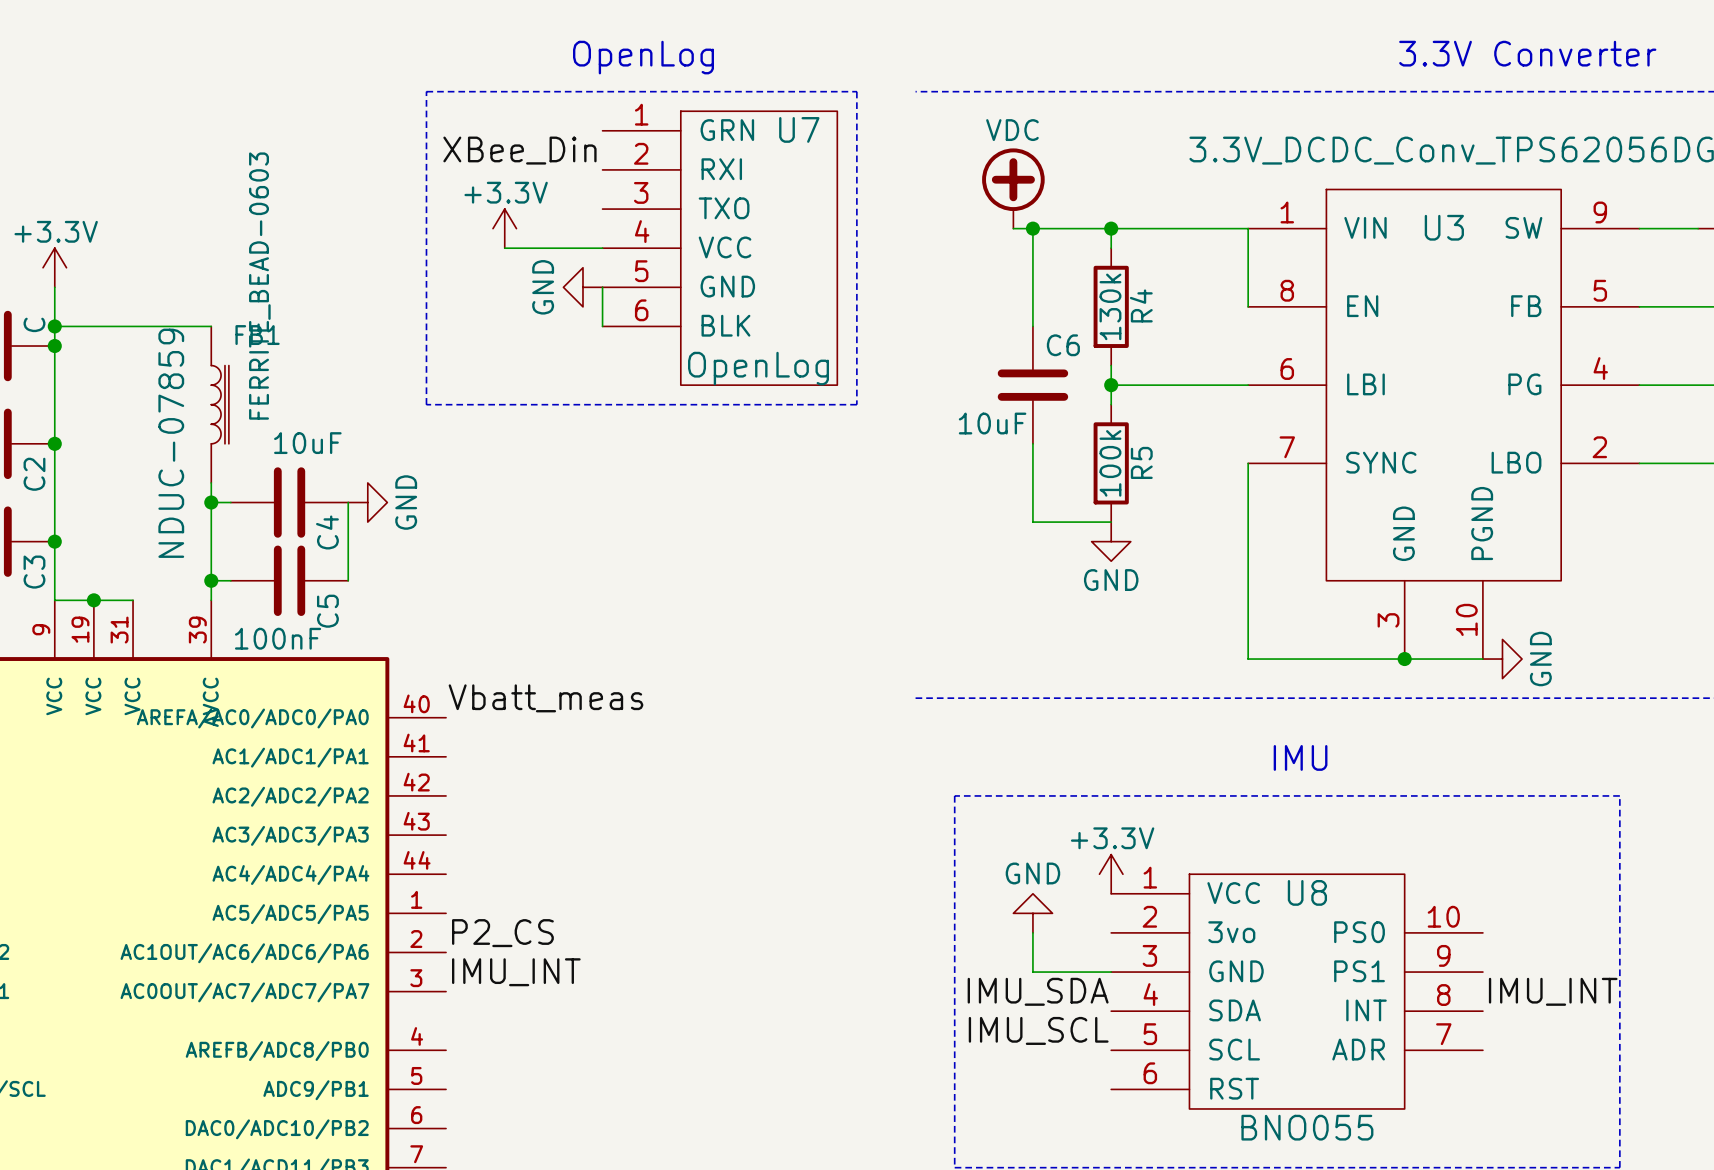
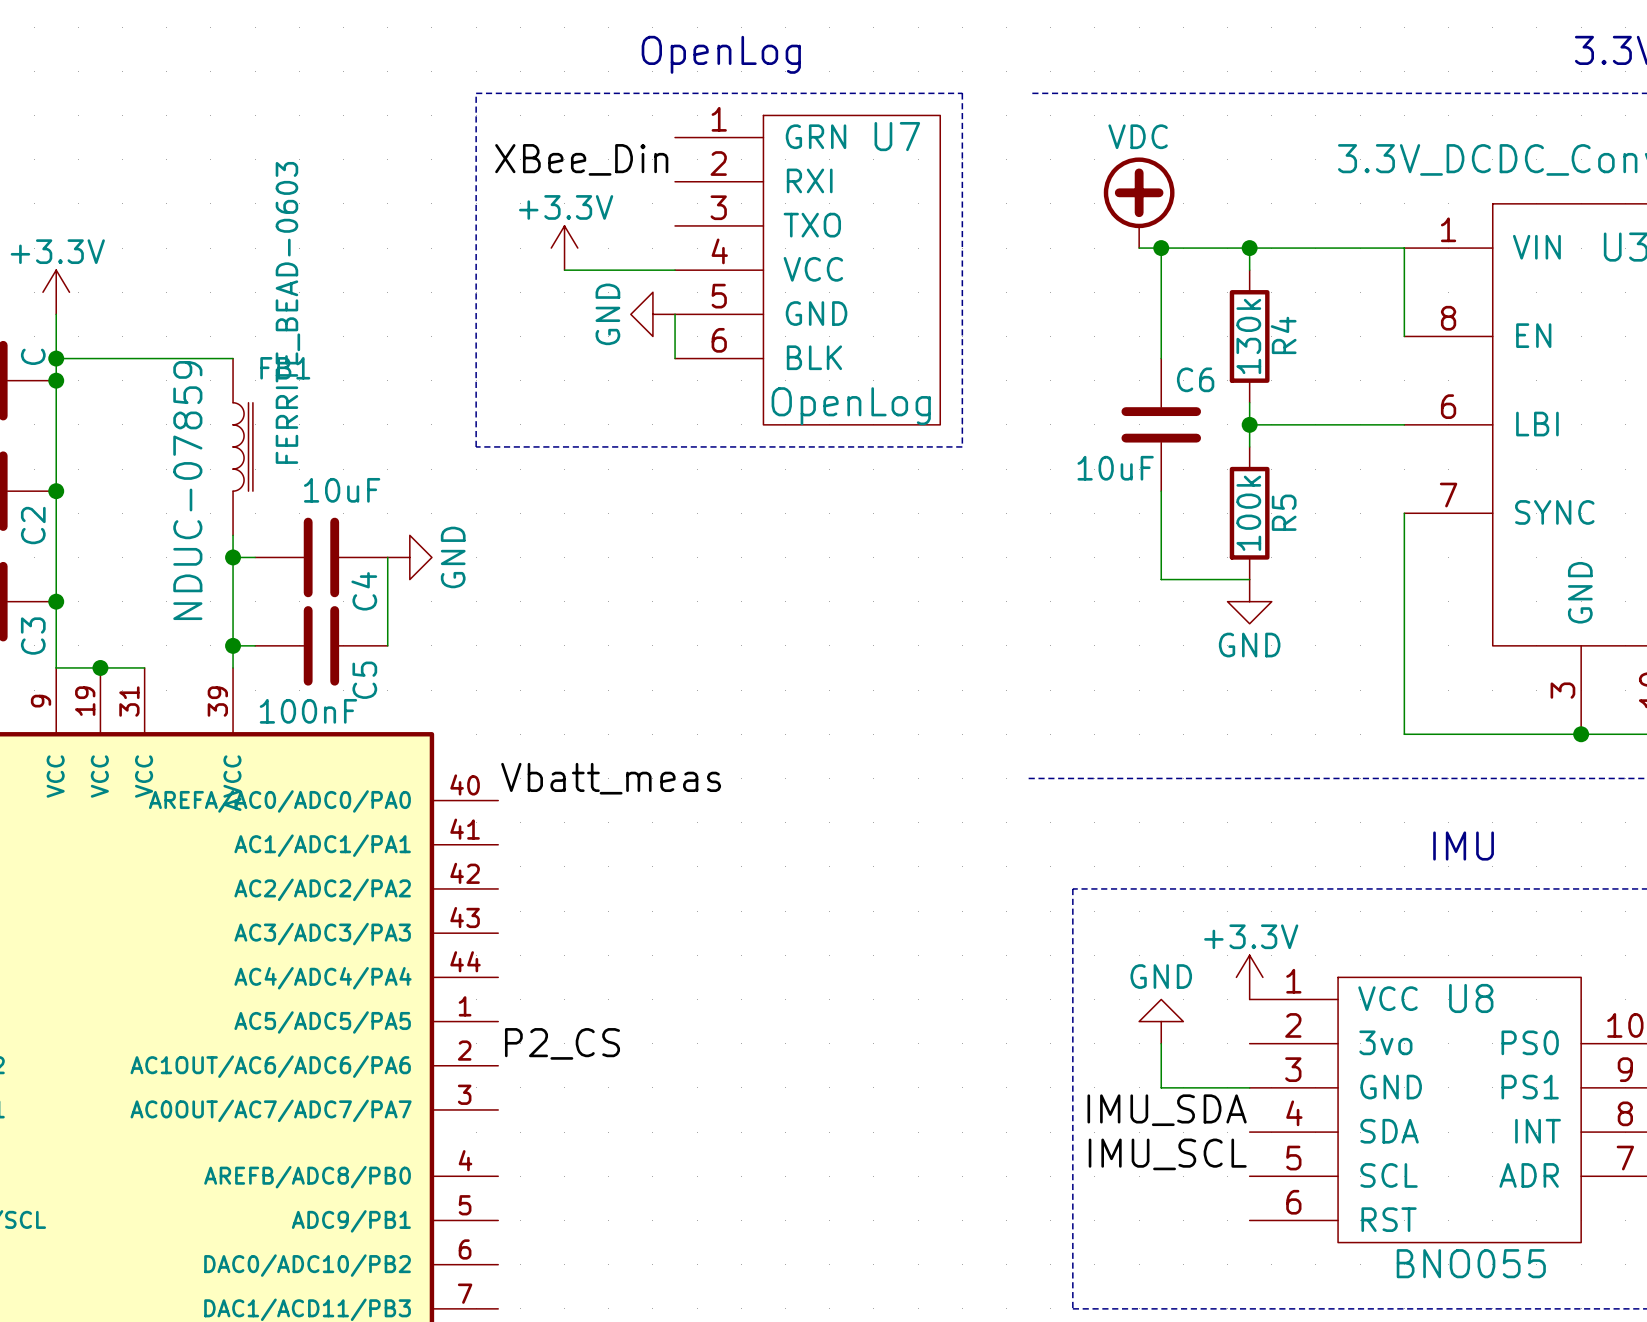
label: IMU_INT (516, 972) -> none

